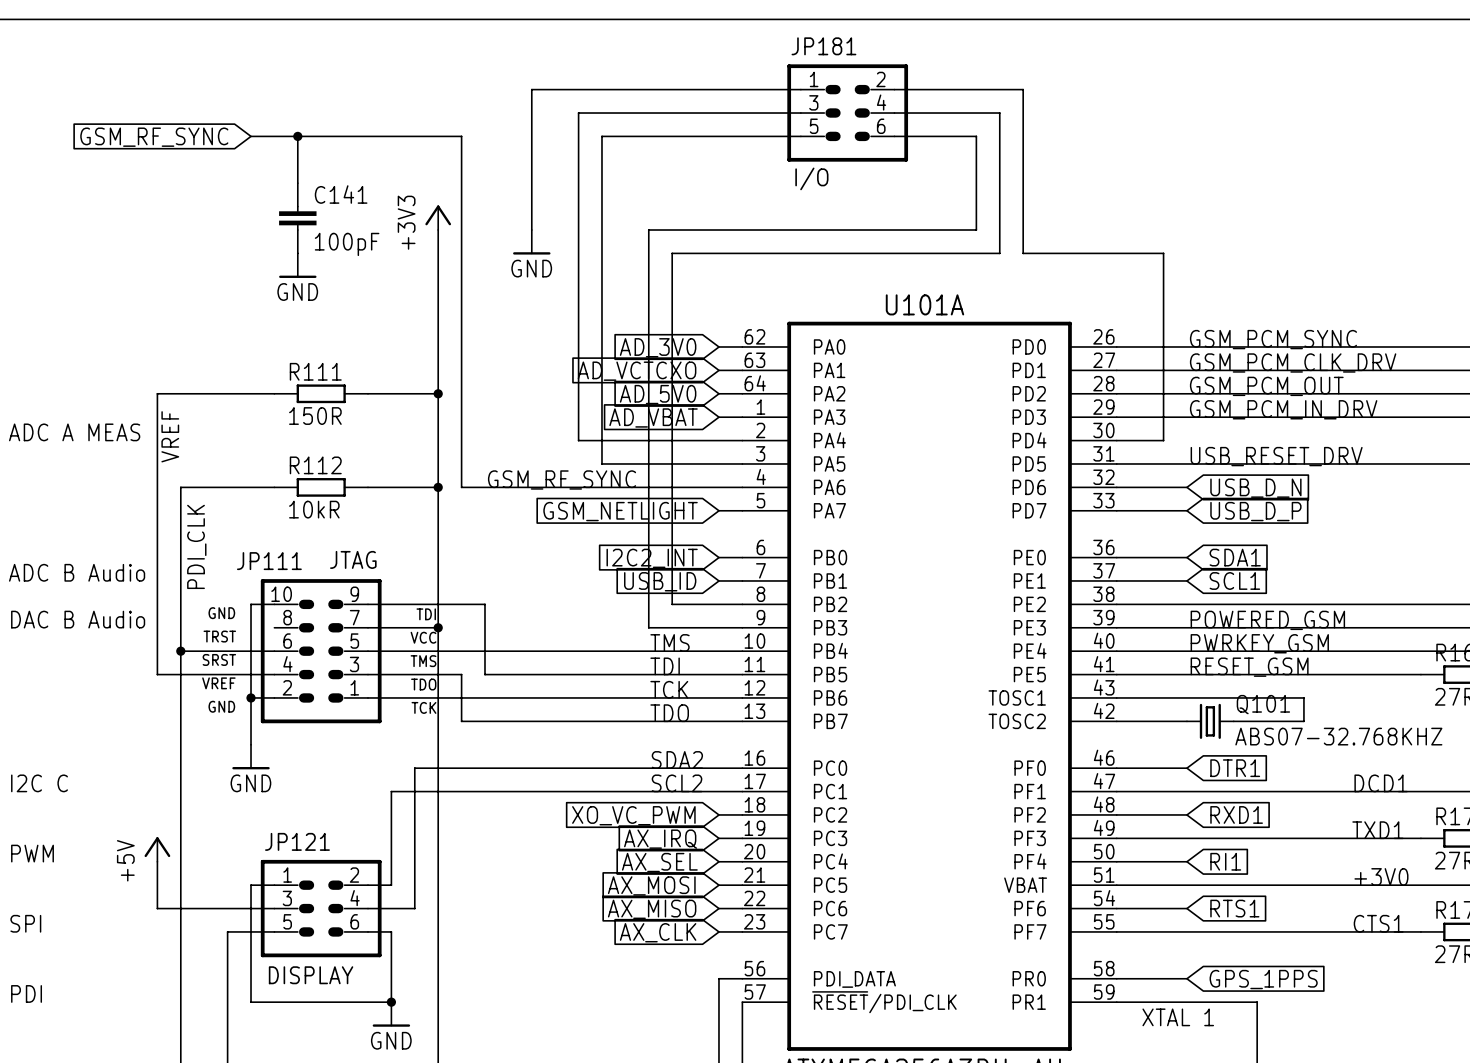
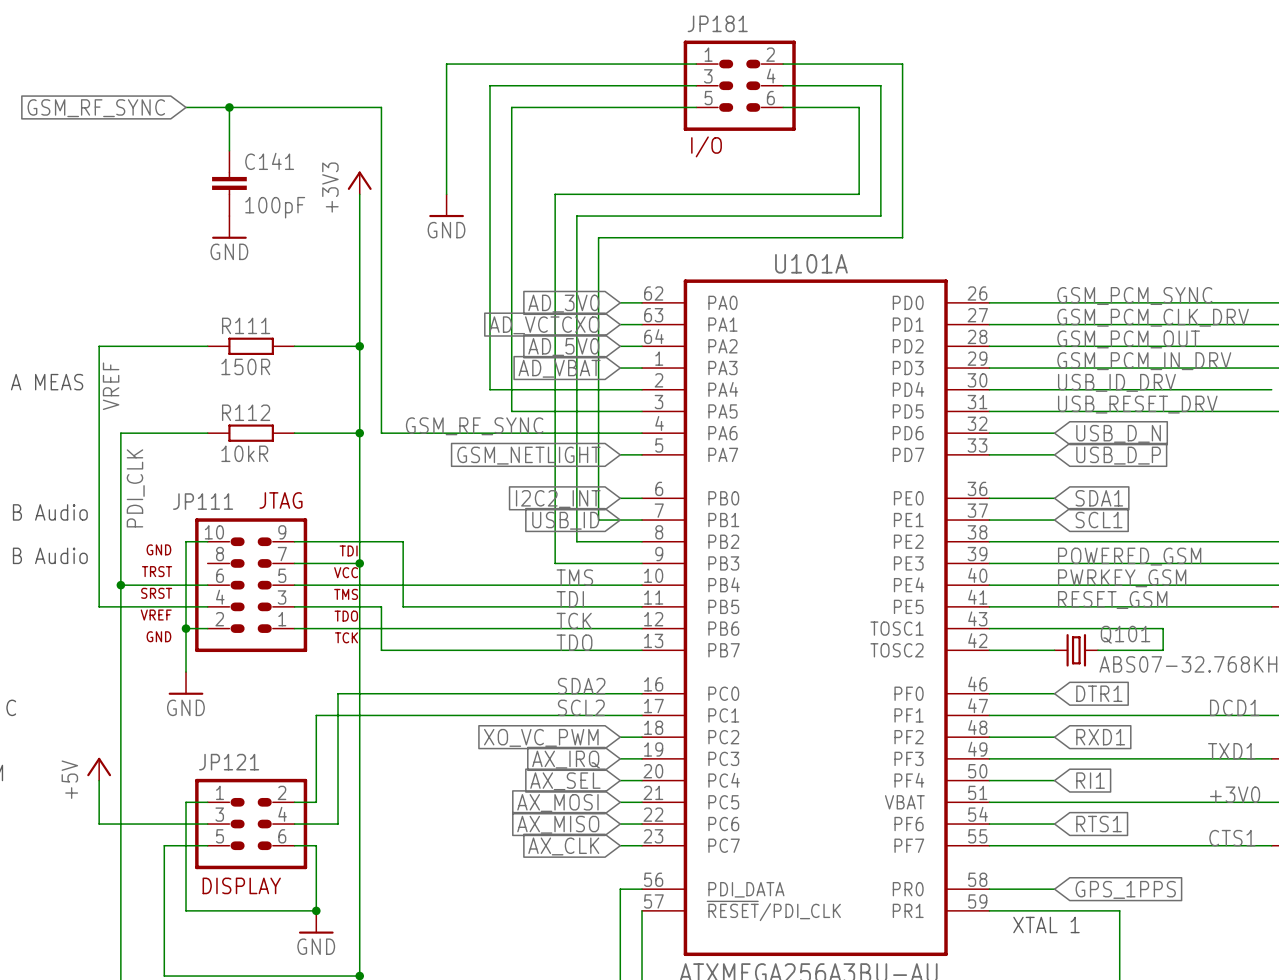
wire: (1023, 253) (1163, 253) (1163, 440) -> (1271, 389) (1032, 389)
wire: none -> (902, 216) (902, 237) (598, 237) (598, 520) (620, 520)
label: none -> USB_ID_DRV (1116, 382)

